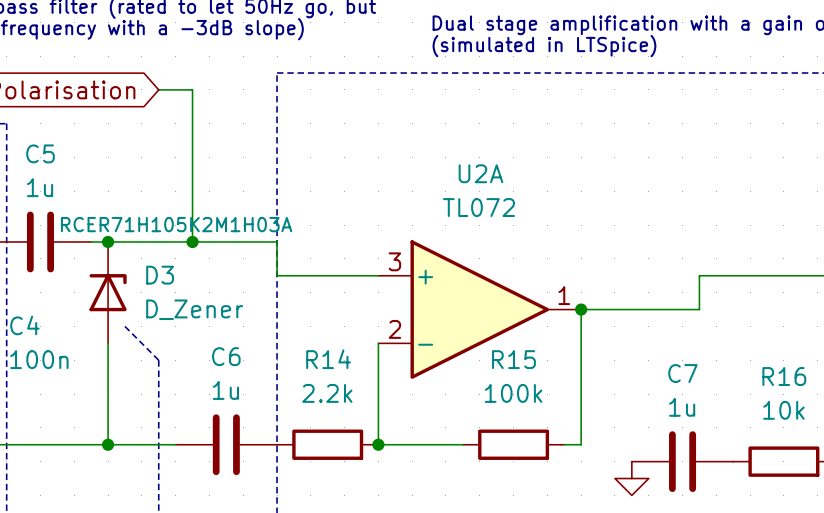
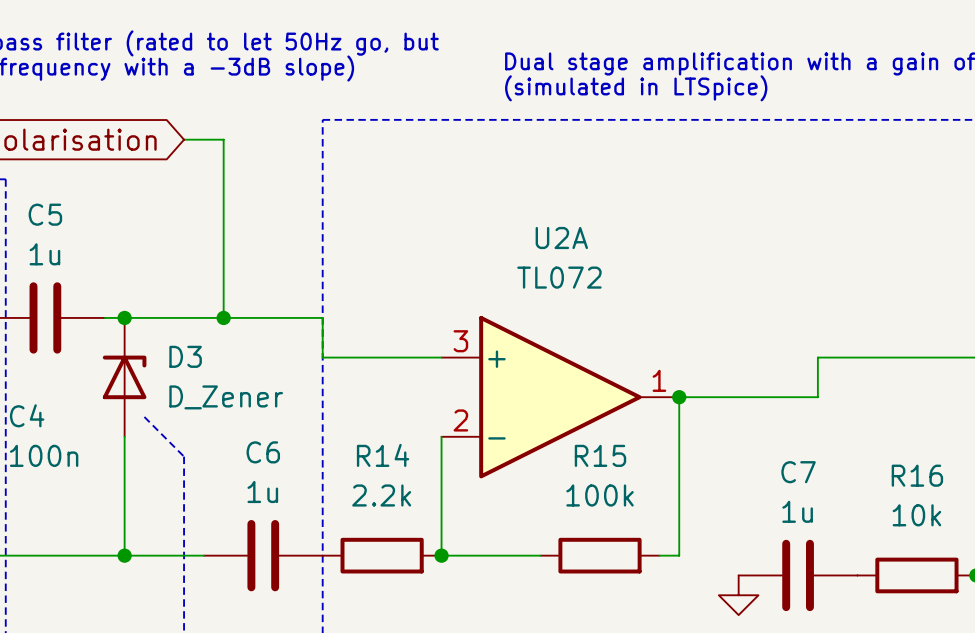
C5 text: RCER71H105K2M1H03A (176, 224) -> none

